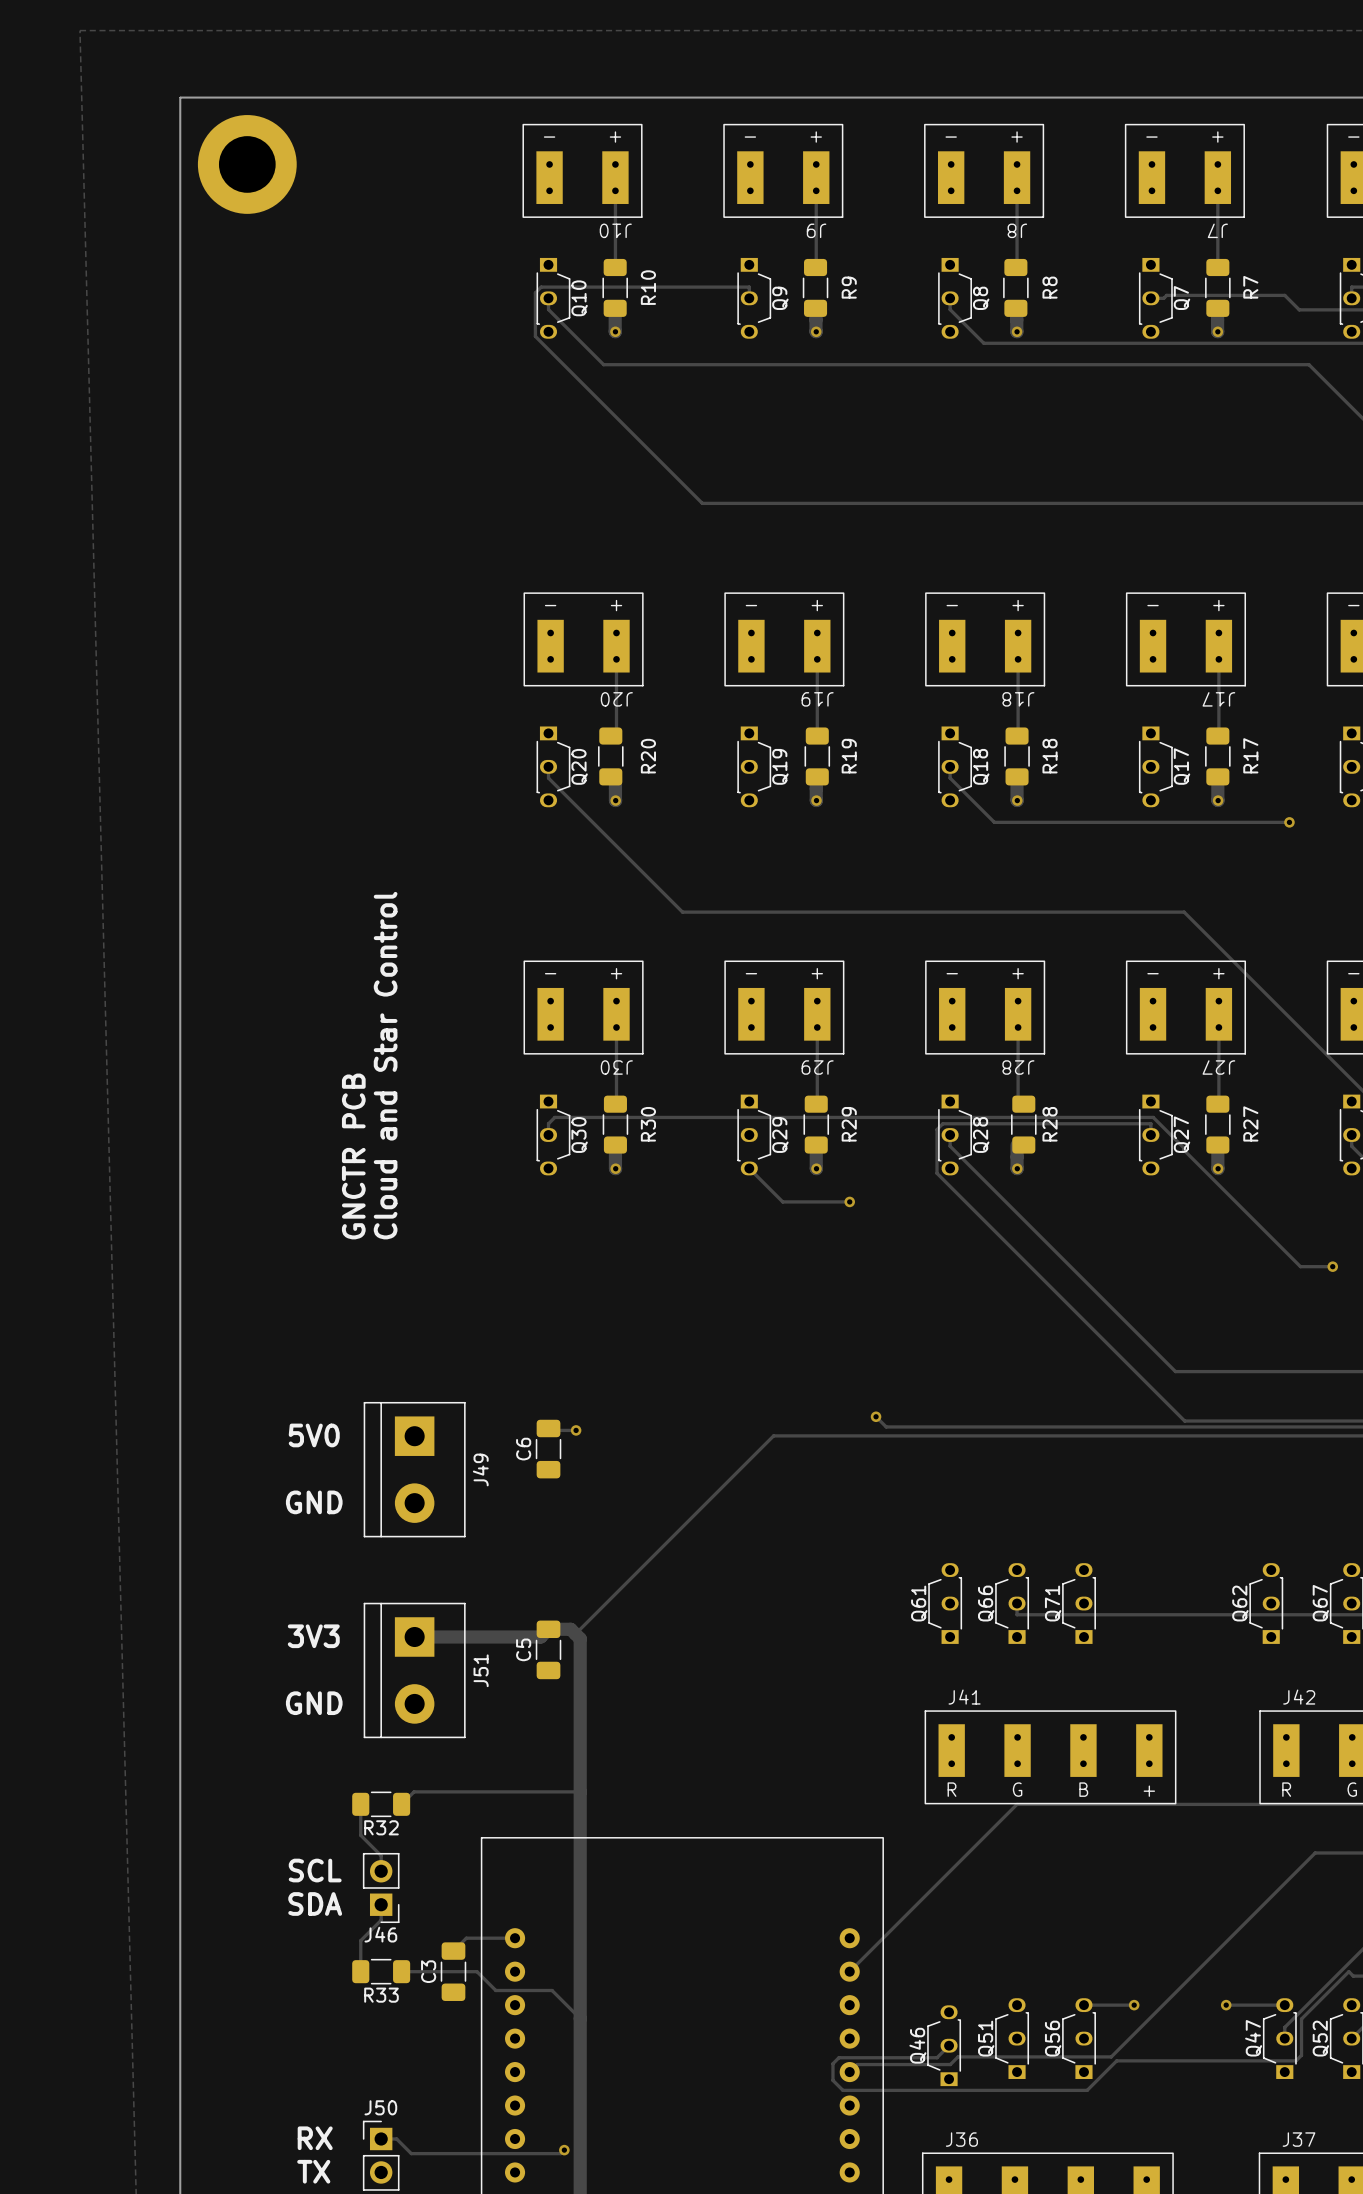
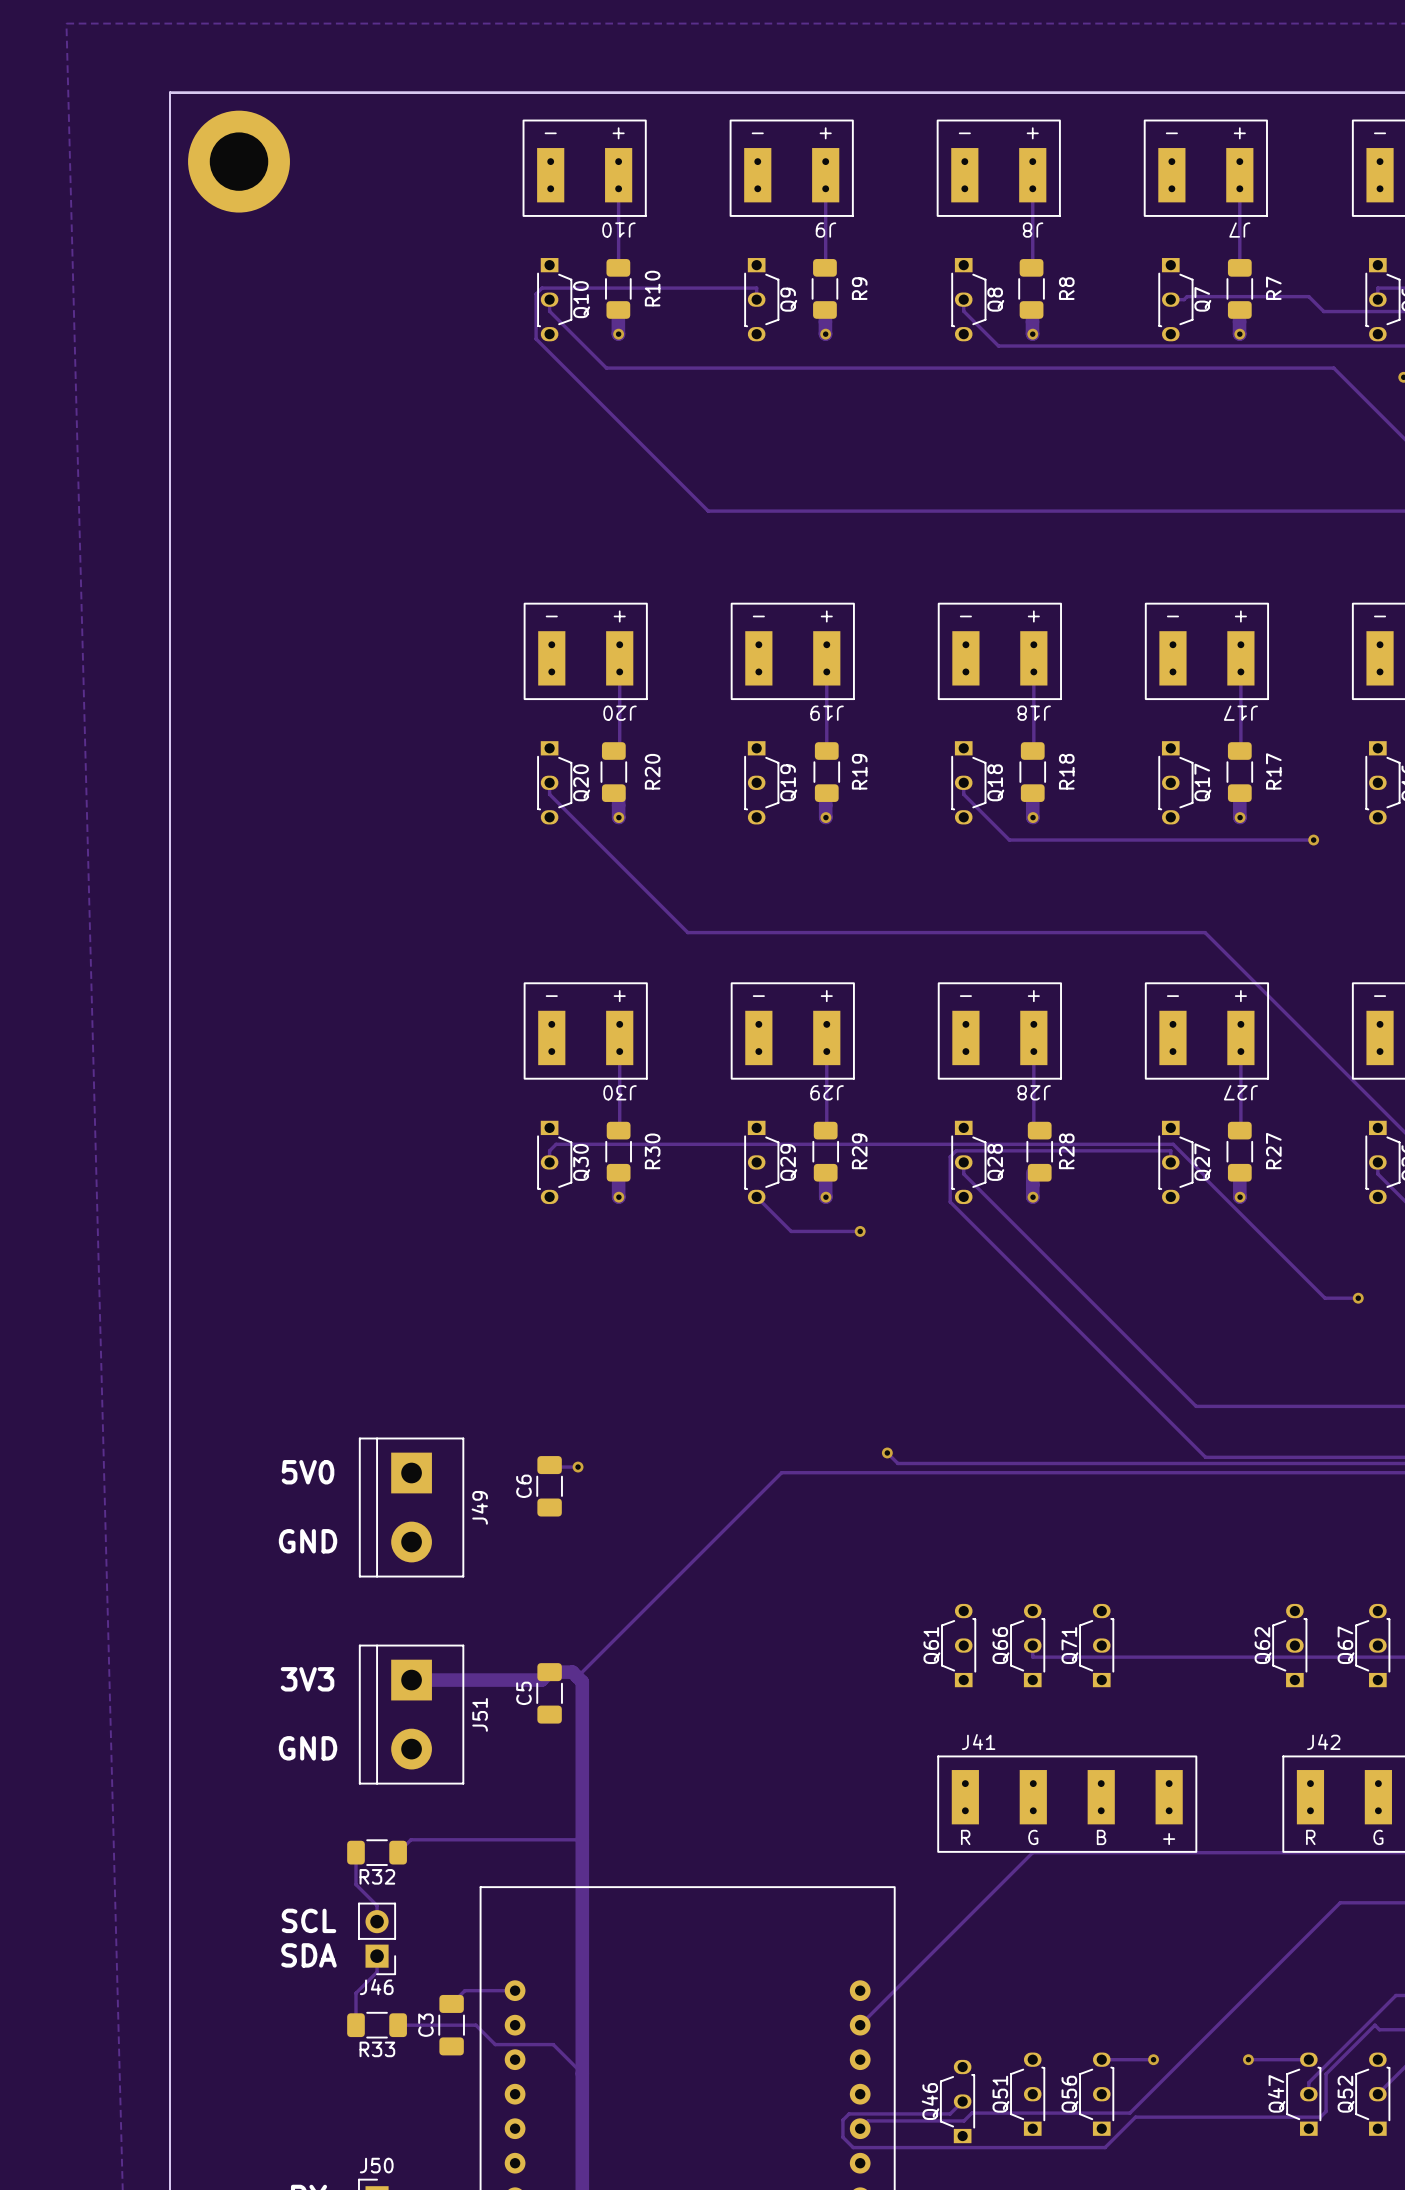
text: Cloud and Star Control (385, 1065) -> none
text: GNCTR PCB (353, 1156) -> none

